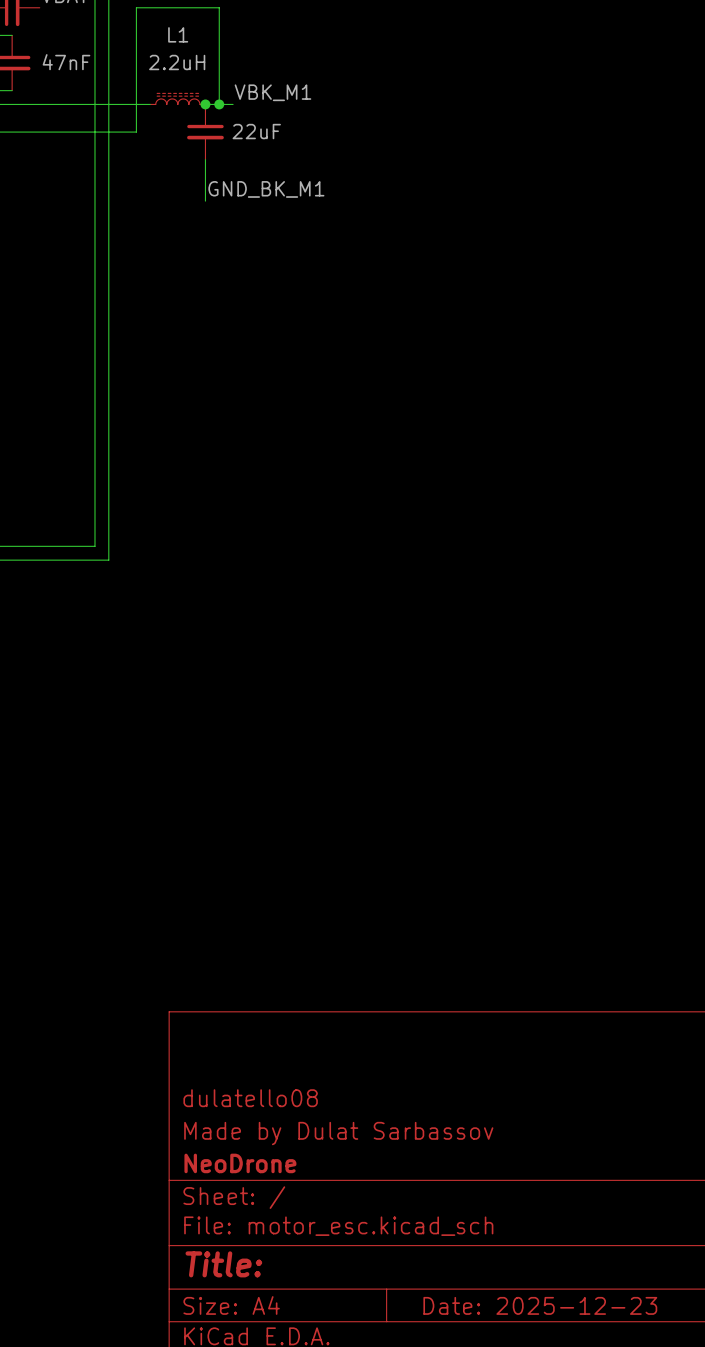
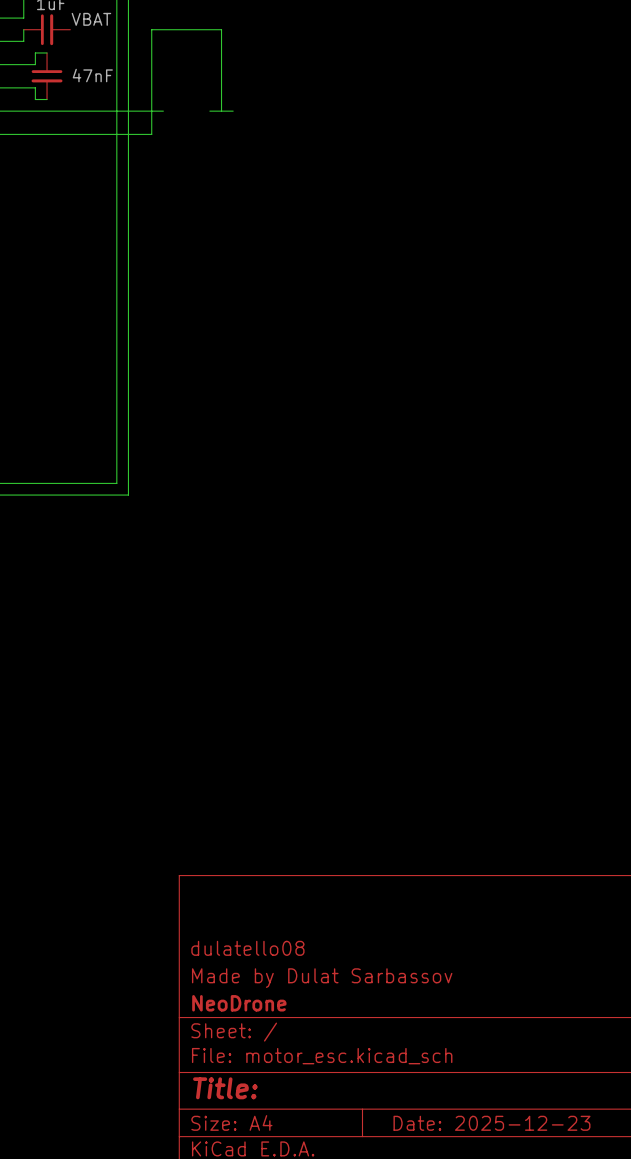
label: VBK_M1 (272, 92) -> none
L1: 2.2uH (177, 98) -> none
junction: (205, 104) -> none
junction: (219, 104) -> none
part: 22uF (205, 132) -> none
wire: (205, 159) (205, 201) -> none
label: GND_BK_M1 (266, 189) -> none

